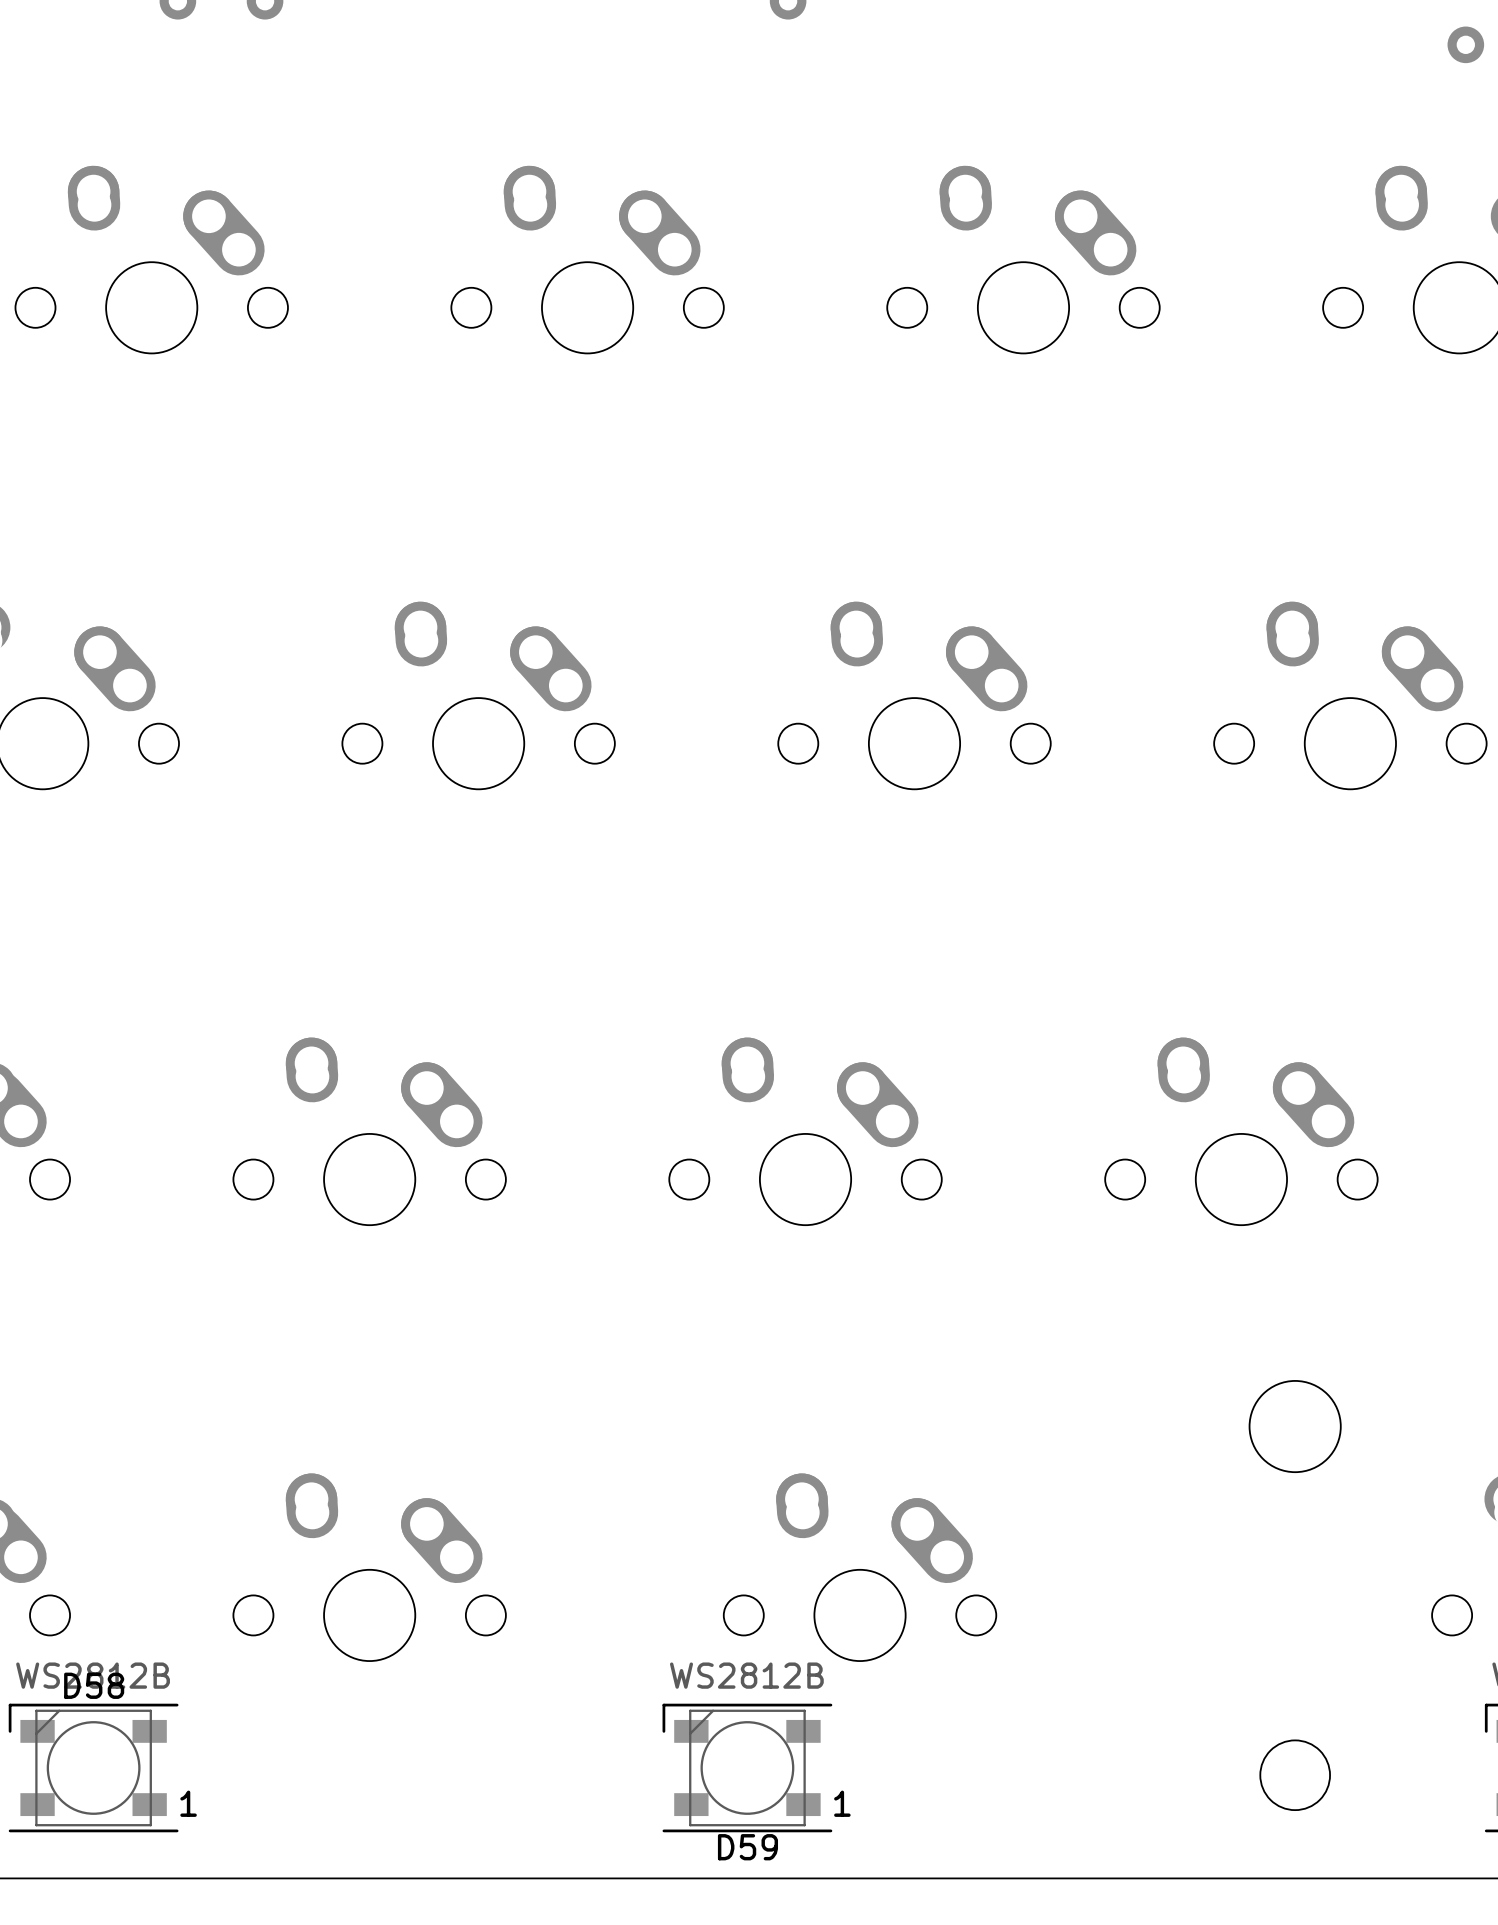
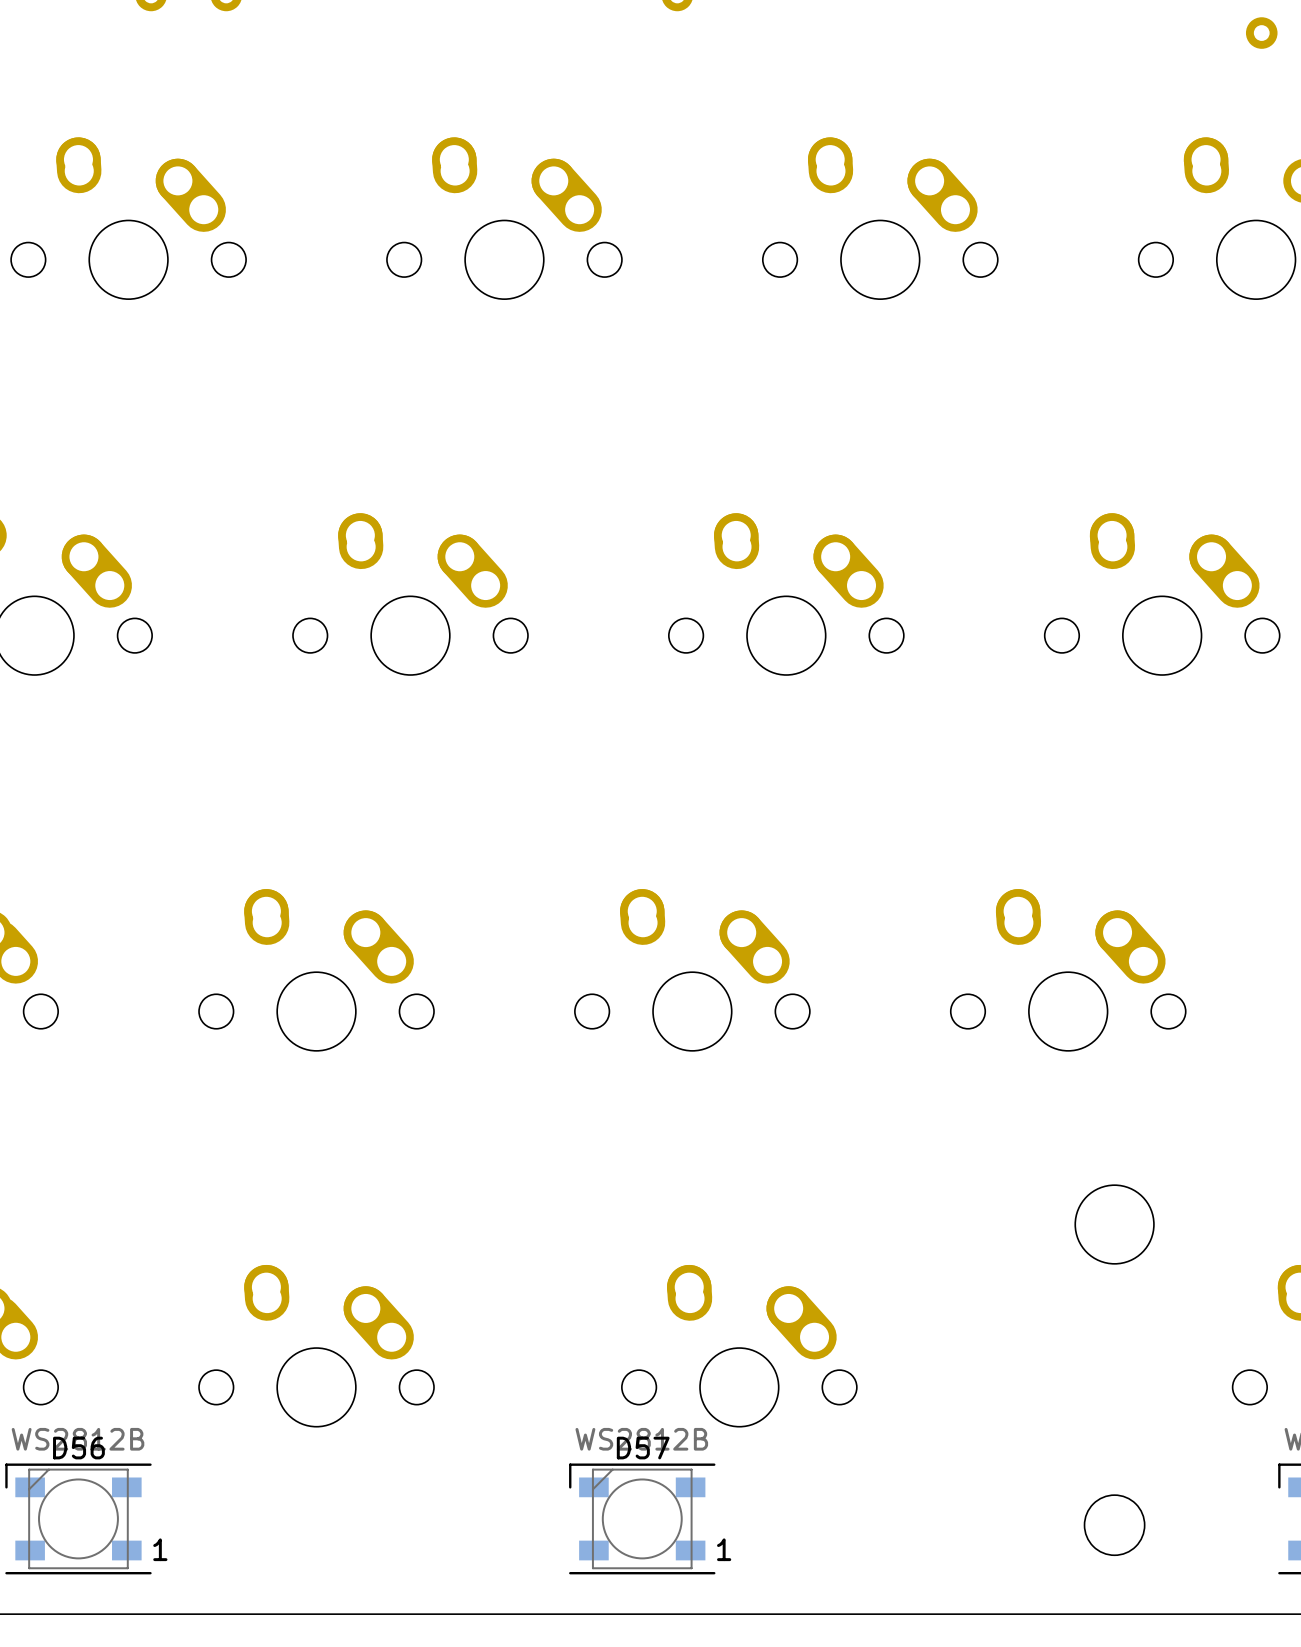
D58 name: D58 (94, 1685) -> D56 (78, 1448)
D59 name: D59 (747, 1847) -> D57 (643, 1448)

